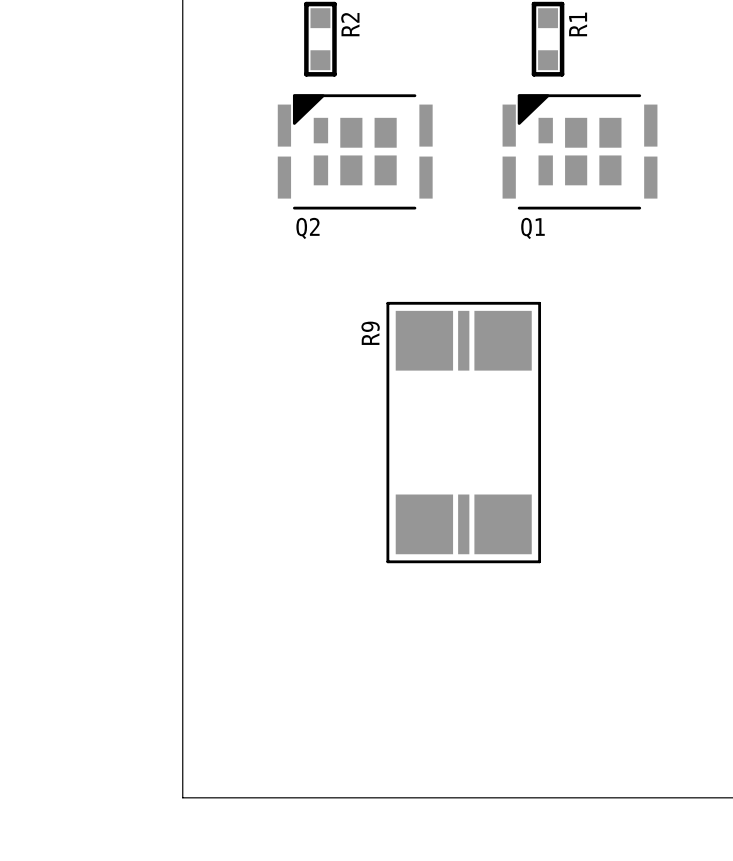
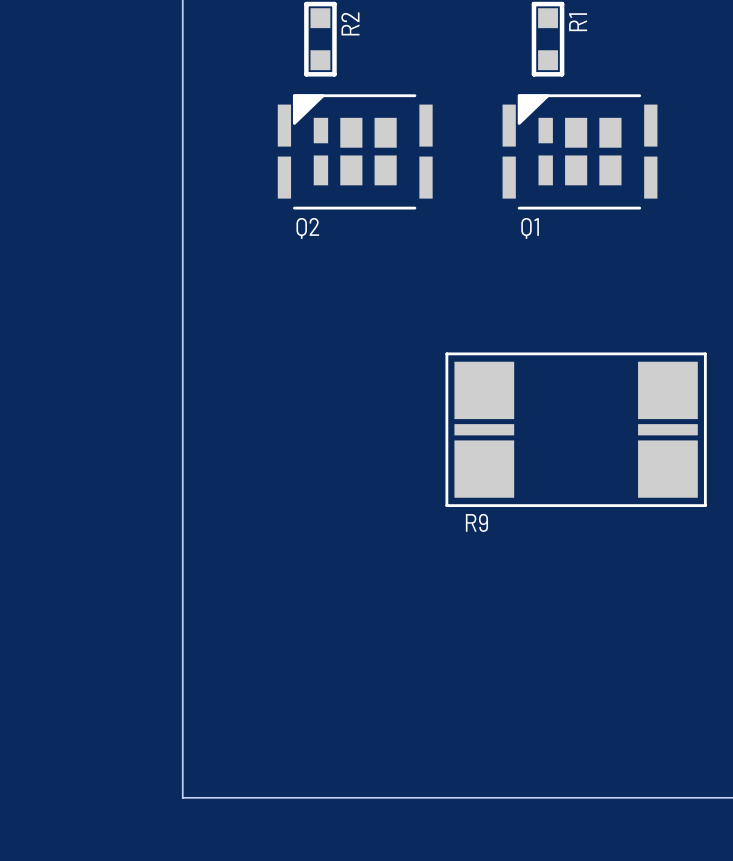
R9 name position: R9 (370, 333) -> R9 (476, 522)
R9 rotation: 0° (463, 432) -> 90° clockwise (576, 429)

